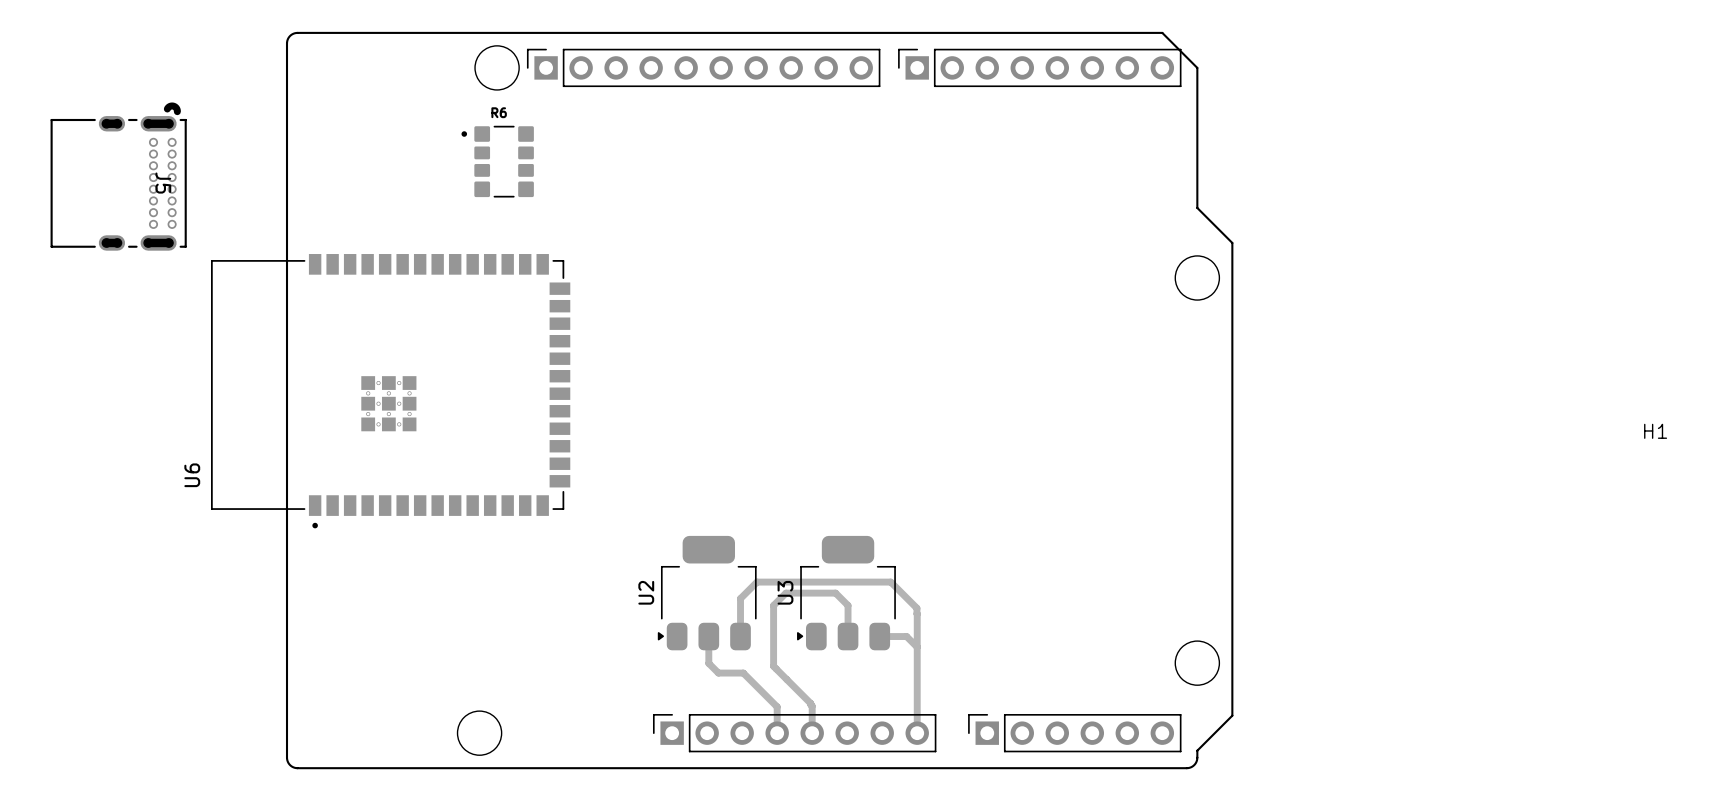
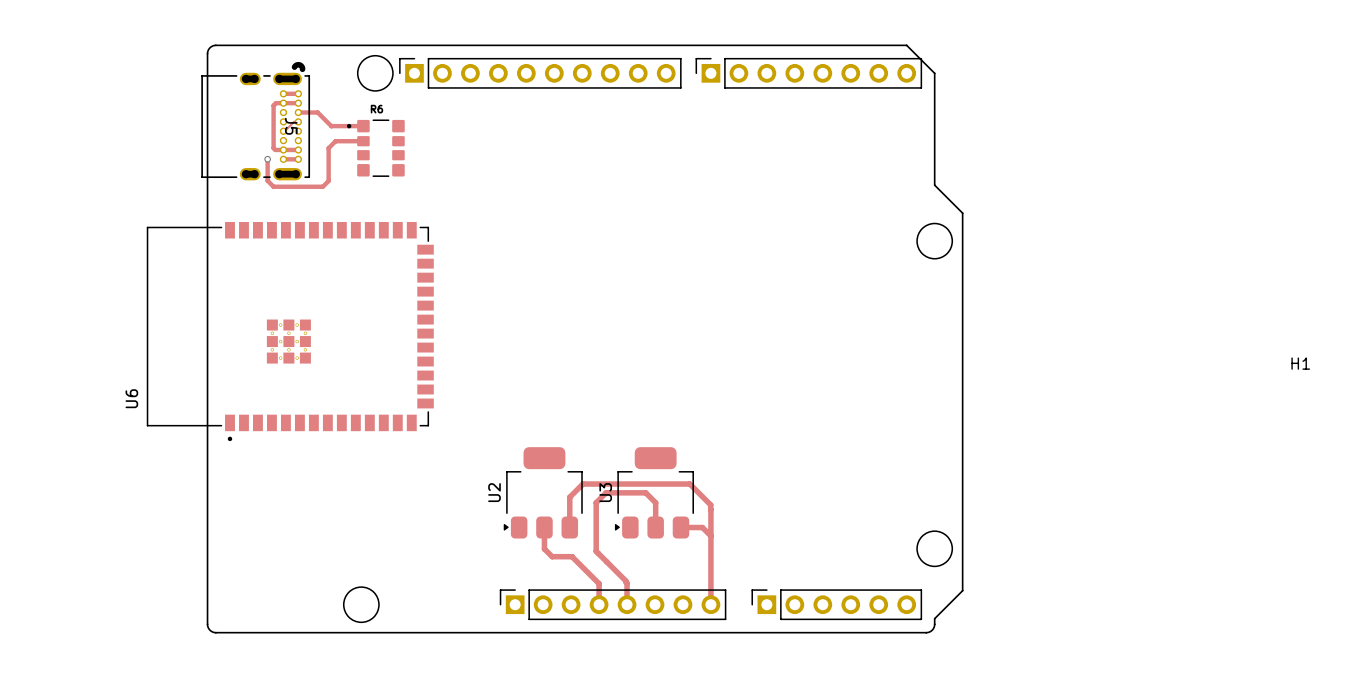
track: none -> (283, 93) (298, 93)
track: none -> (298, 103) (275, 103) (273, 105) (273, 148) (275, 149) (298, 149)
track: none -> (298, 112) (317, 112) (331, 126)
track: none -> (298, 121) (294, 121) (283, 131)
track: none -> (331, 126) (363, 126)
track: none -> (363, 141) (335, 141) (328, 148) (328, 180) (322, 186) (273, 186) (267, 180) (267, 159)
via: none -> (267, 159)
track: none -> (283, 159) (298, 159)
J5 position: (118, 176) -> (255, 121)

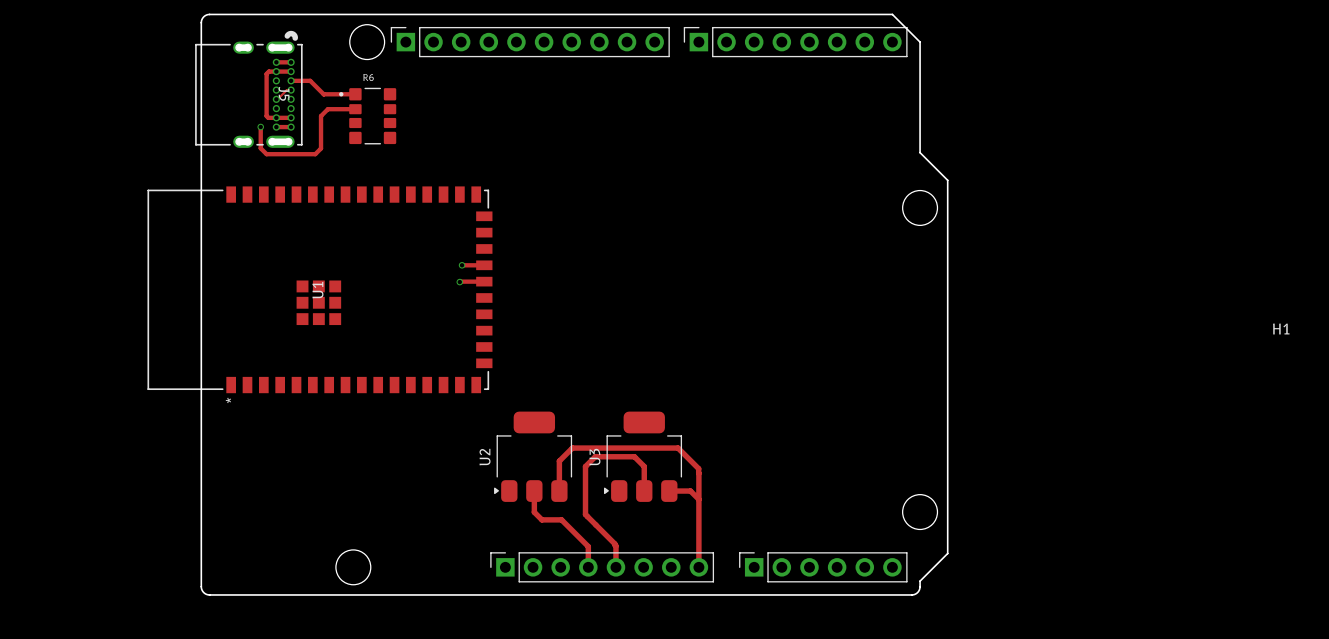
track: none -> (462, 265) (484, 265)
via: none -> (462, 265)
track: none -> (484, 281) (459, 282)
via: none -> (459, 282)
U1: none -> (319, 289)
U6: (290, 331) -> none

